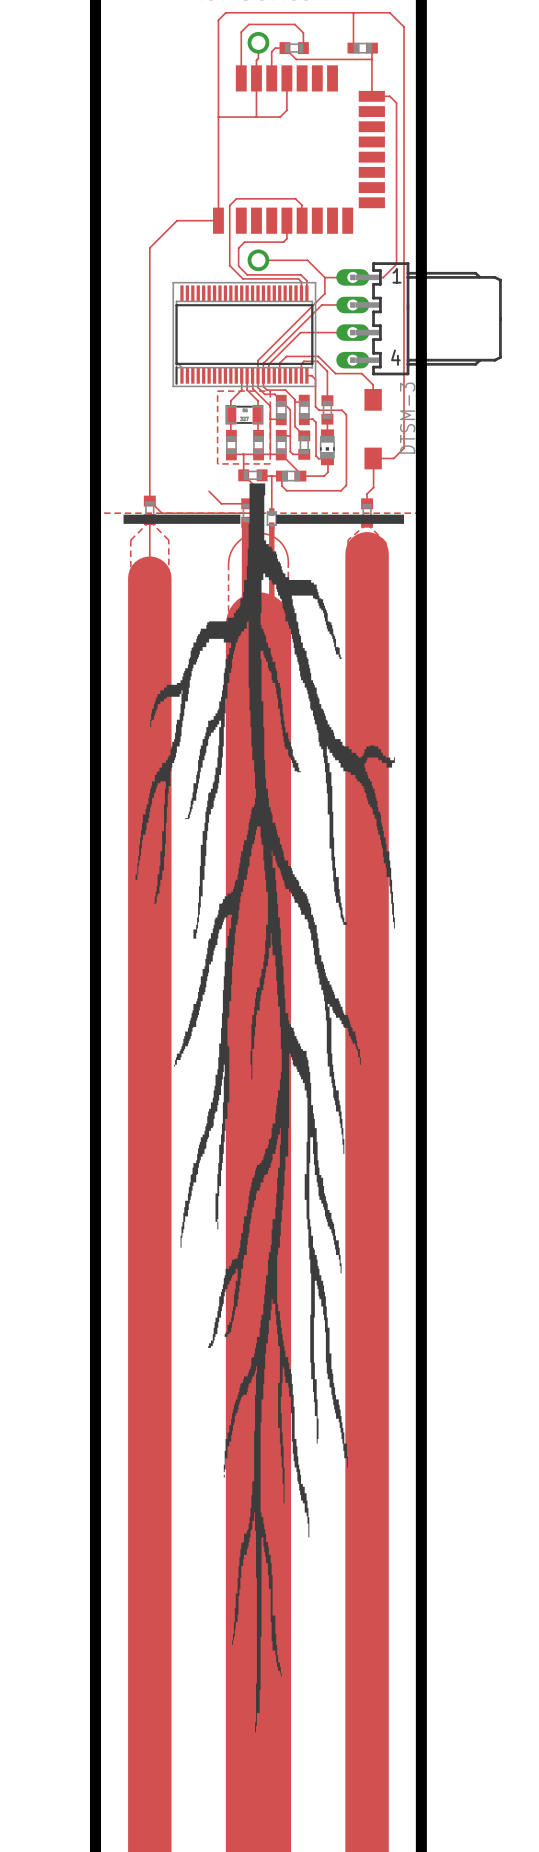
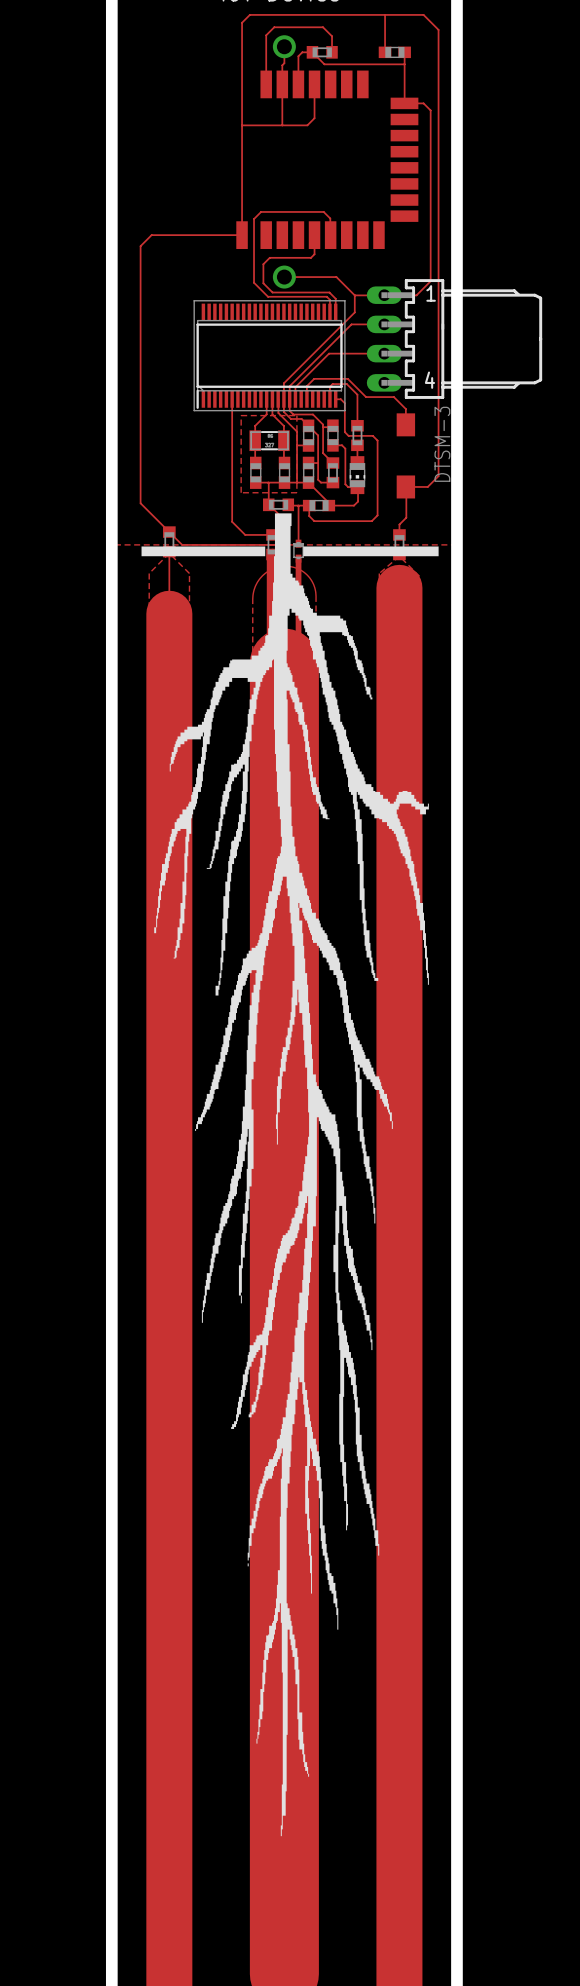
top track: (177, 220) (149, 247) (149, 501) -> (198, 235) (151, 235) (140, 246) (140, 503) (169, 532)
top track: none -> (232, 399) (232, 521)

